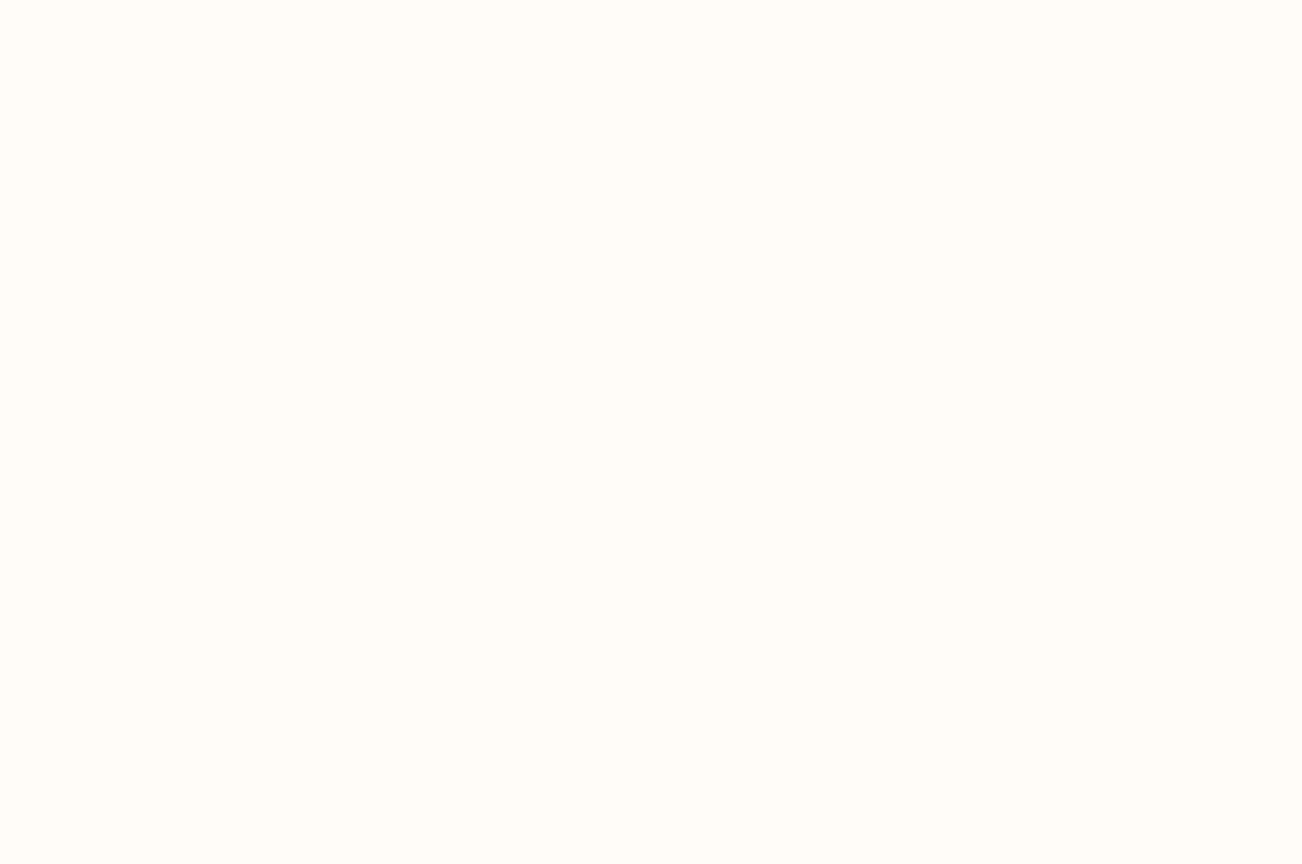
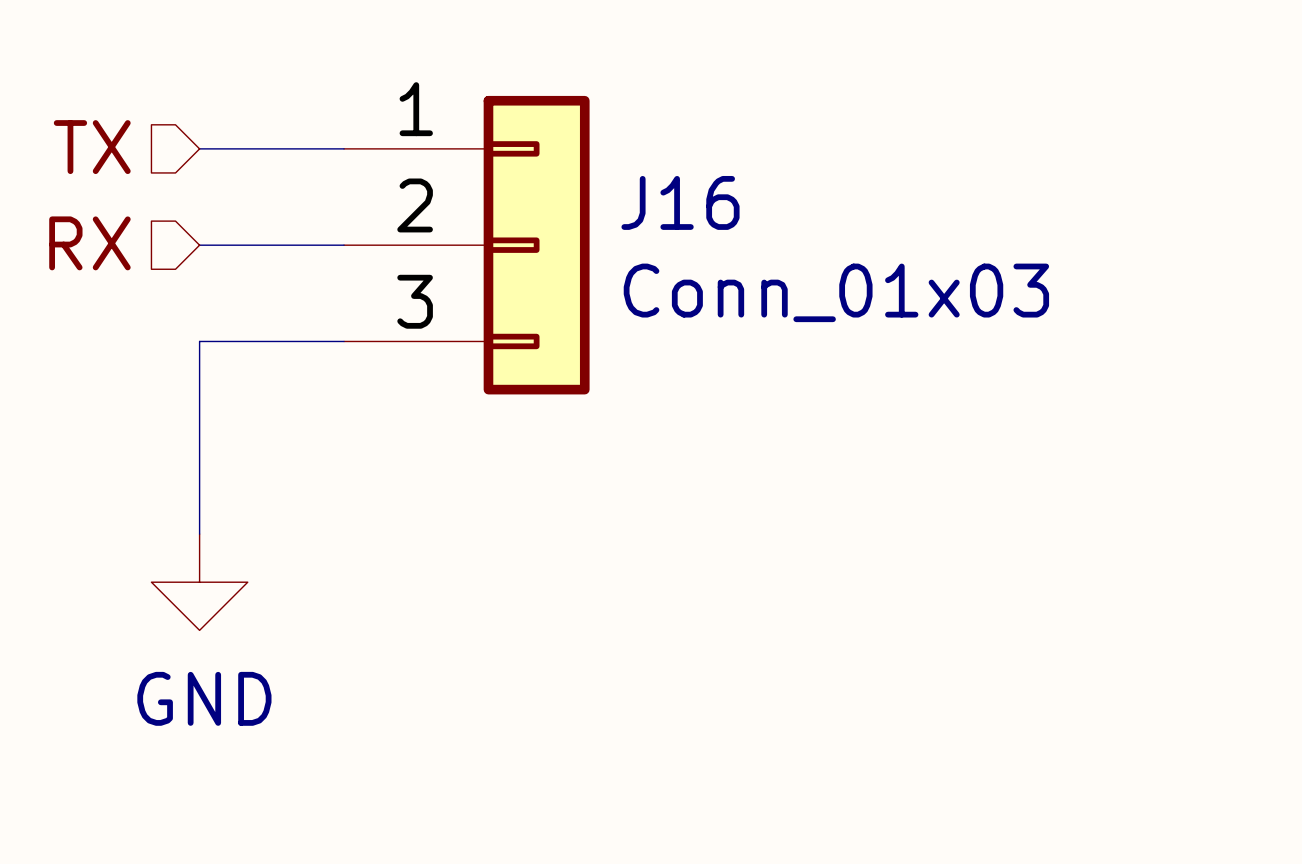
hierarchical label: none -> TX (92, 147)
wire: none -> (199, 148) (344, 148)
hierarchical label: none -> RX (89, 243)
wire: none -> (199, 245) (344, 245)
J16: none -> Conn_01x03 (466, 245)
wire: none -> (344, 341) (199, 341) (199, 534)
power symbol: none -> GND (199, 582)

